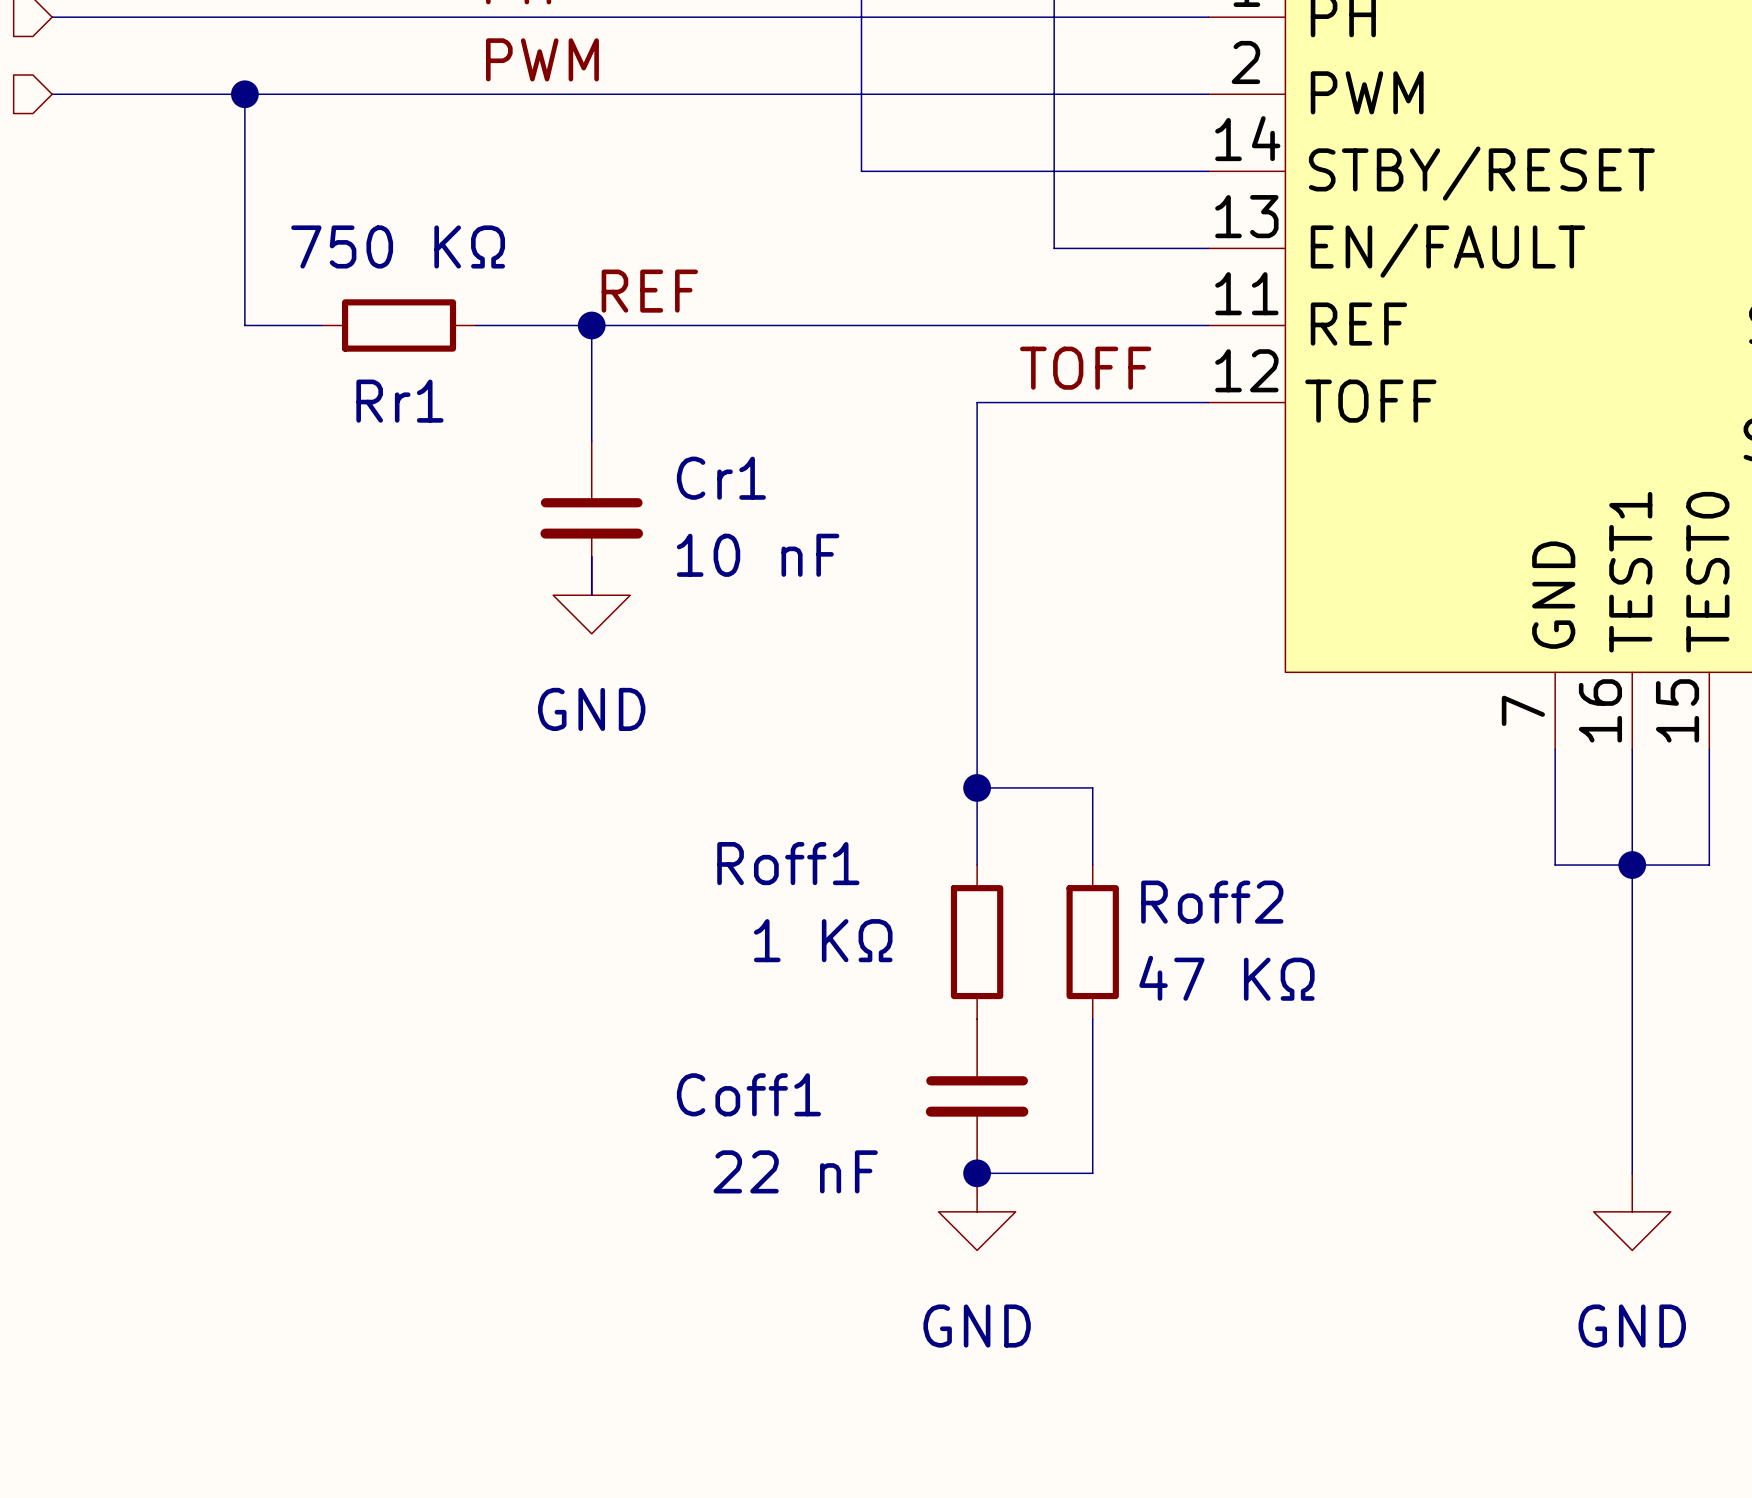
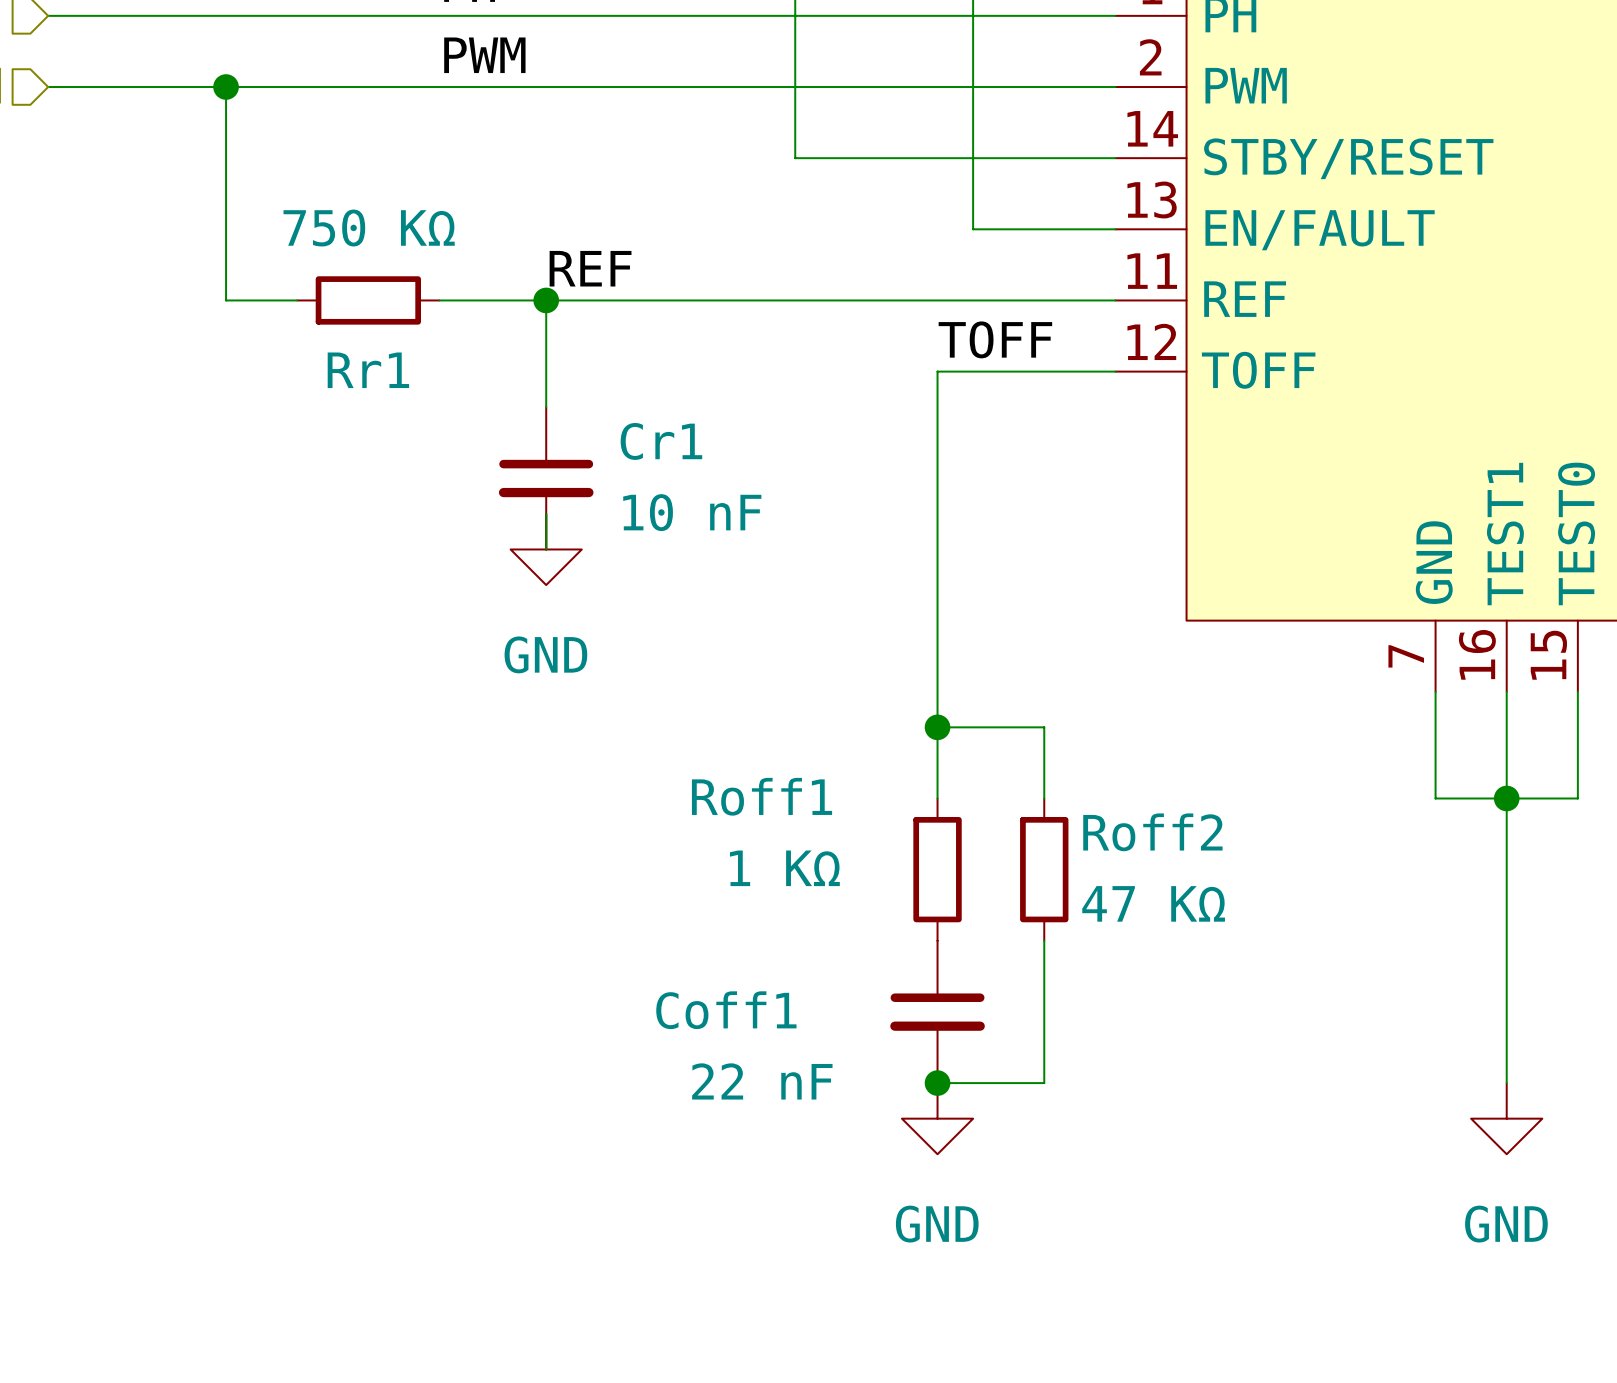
wire: (1015, 402) (977, 402) (977, 865) -> (937, 371) (937, 798)
wire: (977, 787) (1015, 787) -> none
junction position: (977, 787) -> (937, 727)
wire: (1092, 787) (1092, 865) -> (1008, 727) (1044, 727) (1044, 798)
Roff1 position: (977, 942) -> (937, 869)
Roff2 position: (1092, 942) -> (1044, 869)
wire: (1092, 1019) (1092, 1173) -> (1044, 940) (1044, 1083) (1008, 1083)
Coff1 position: (977, 1096) -> (937, 1011)
wire: (977, 1173) (1015, 1173) -> none
junction position: (977, 1173) -> (937, 1083)
power symbol position: GND (977, 1211) -> GND (937, 1118)

